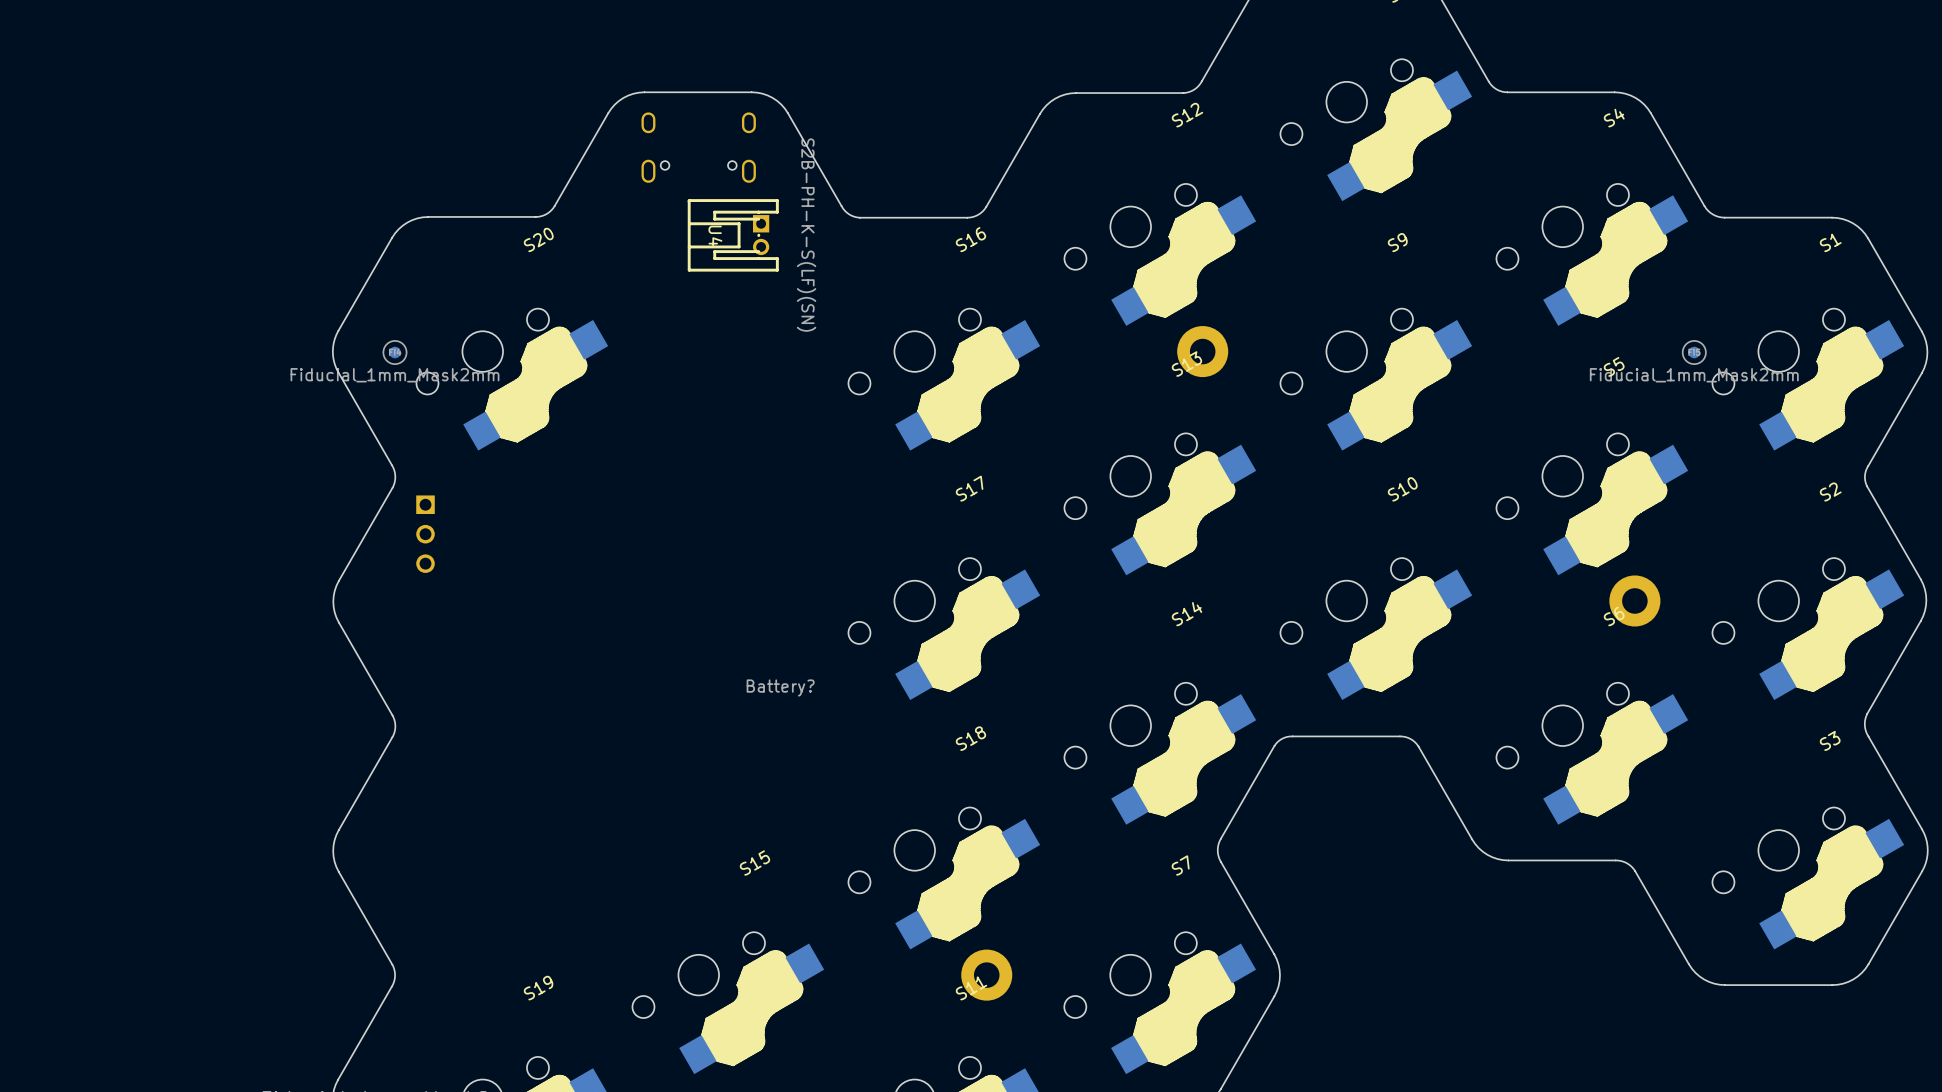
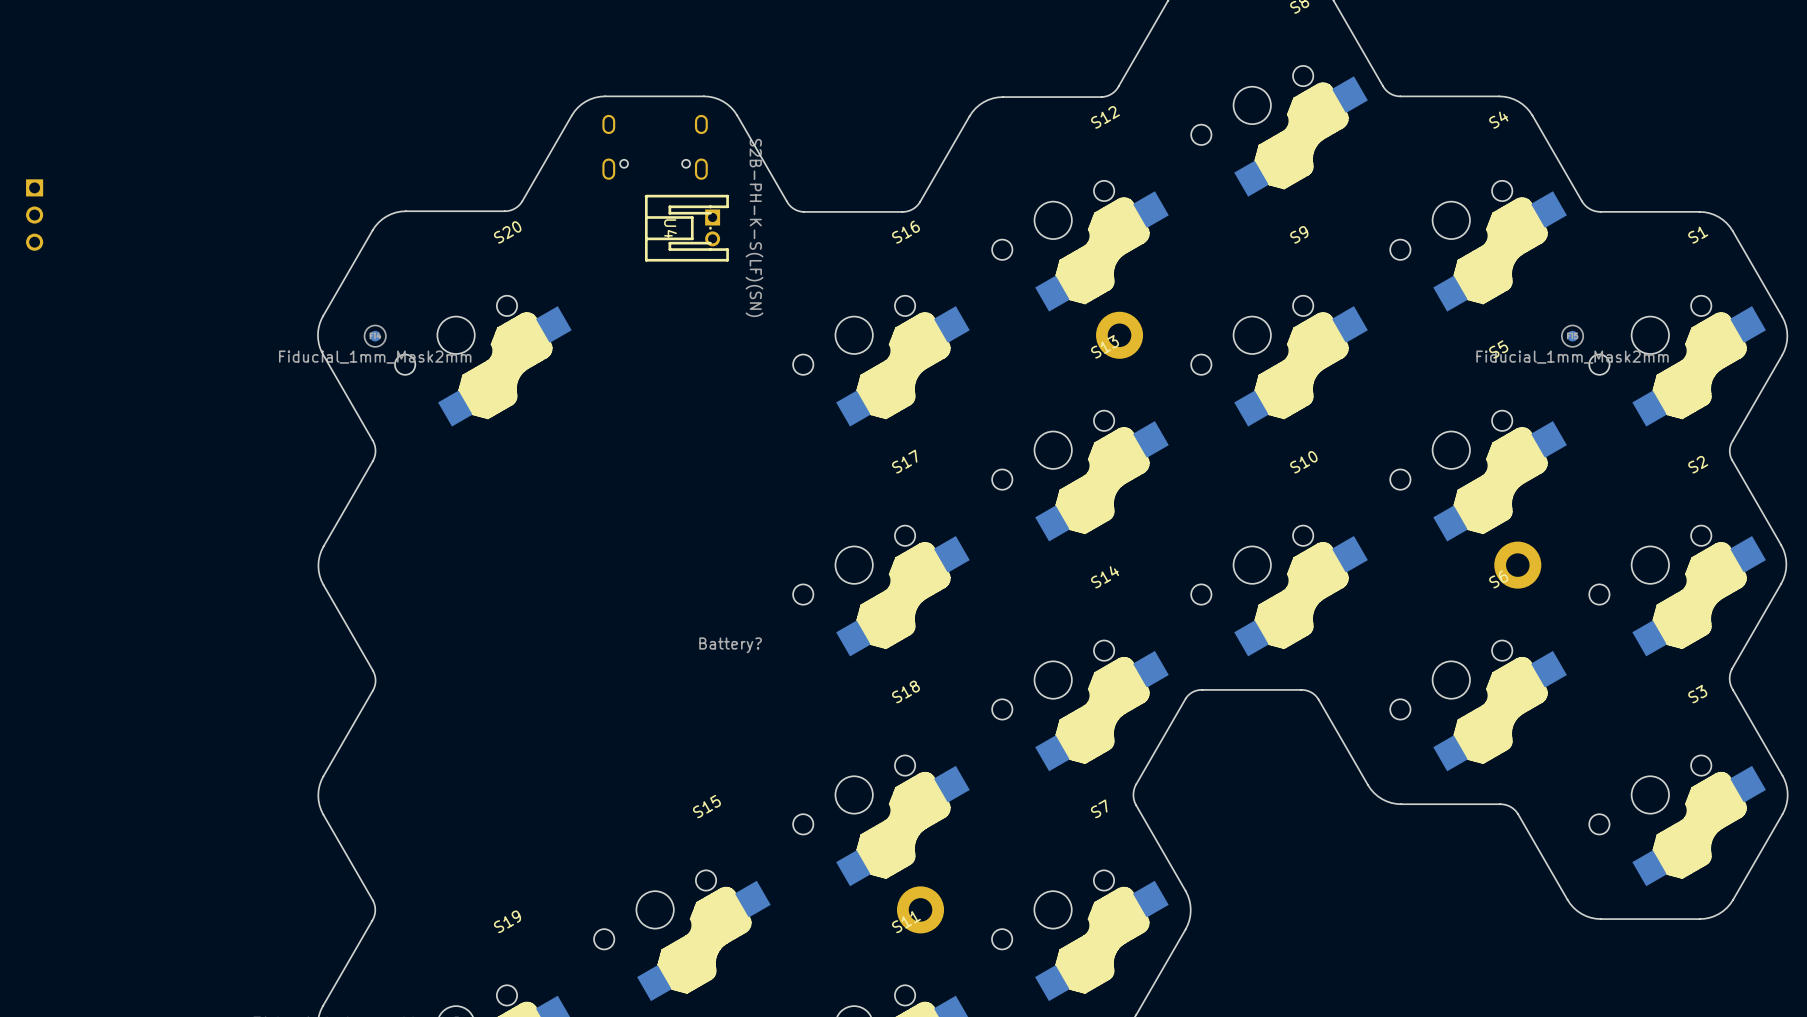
part: none -> (34, 215)
part: (425, 534) -> none

